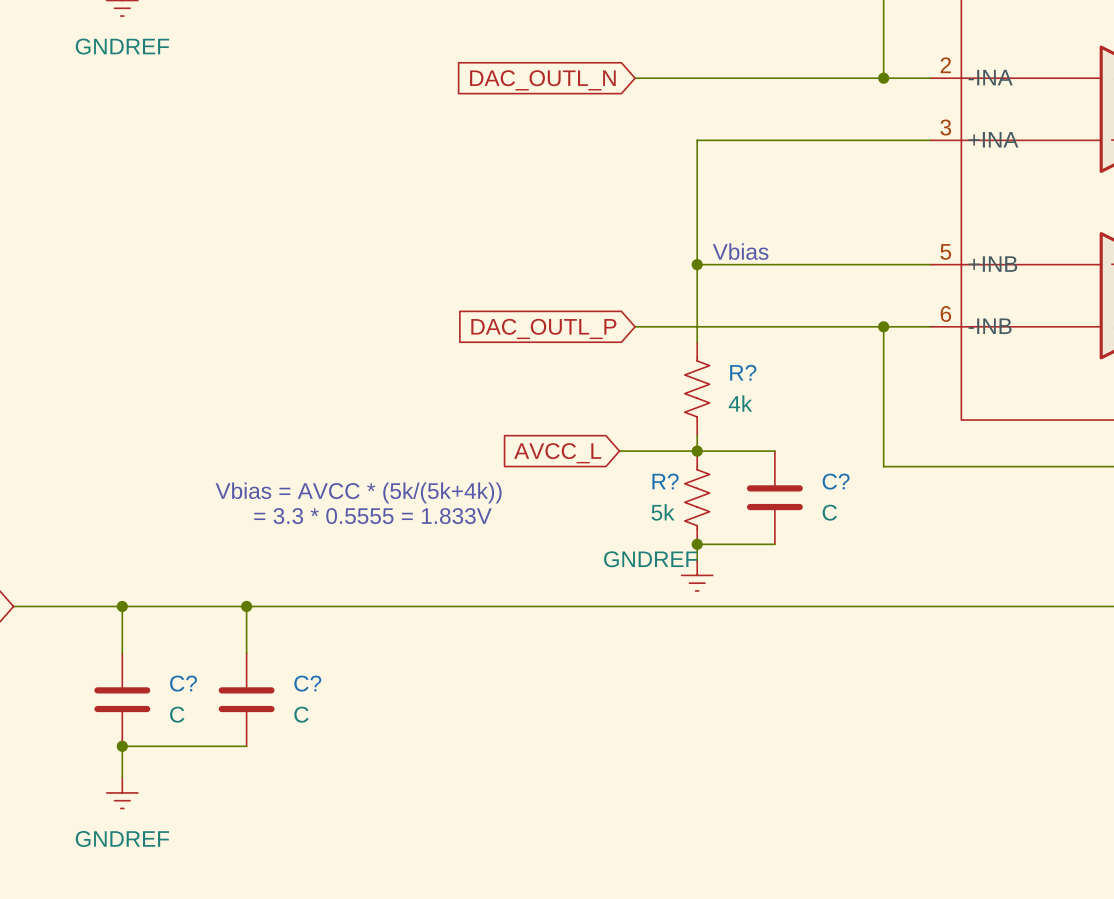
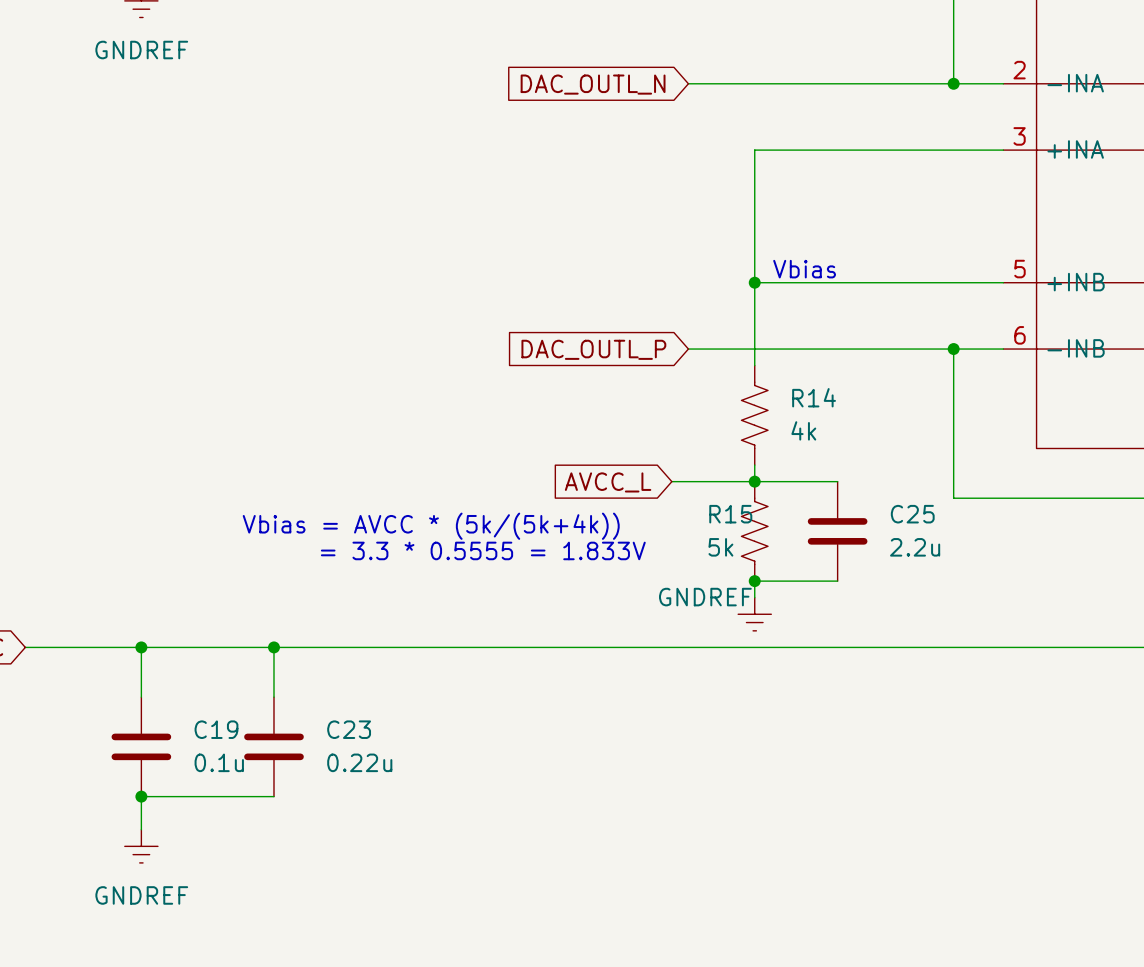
R? name: R? (743, 372) -> R14 (814, 397)
R? name: R? (665, 481) -> R15 (730, 514)
C? name: C? (836, 481) -> C25 (912, 514)
C? value: C (829, 512) -> 2.2u (915, 547)
C? name: C? (183, 683) -> C19 (216, 729)
C? name: C? (307, 683) -> C23 (349, 729)
C? value: C (177, 714) -> 0.1u (219, 762)
C? value: C (301, 714) -> 0.22u (359, 762)

